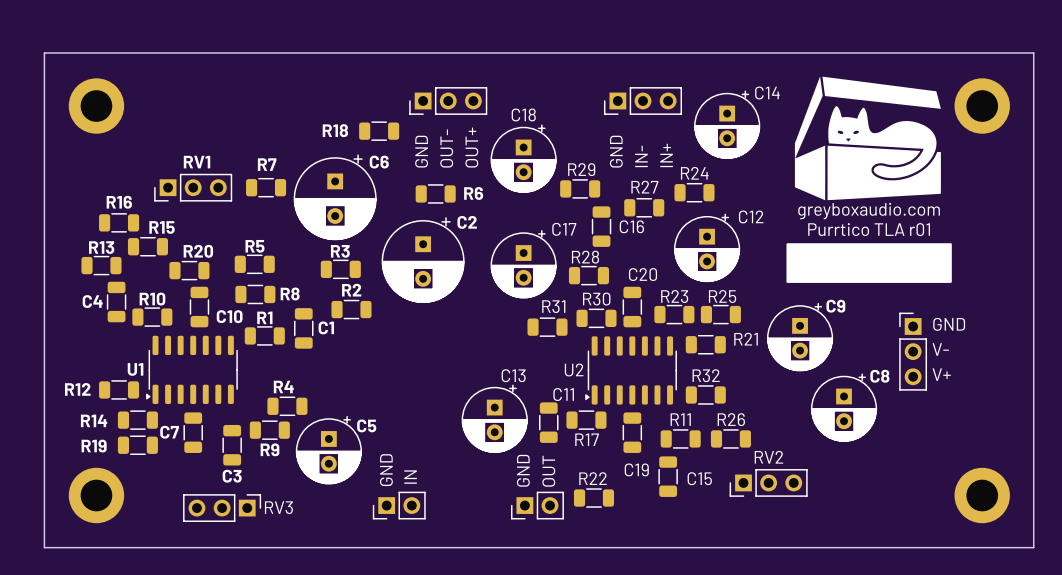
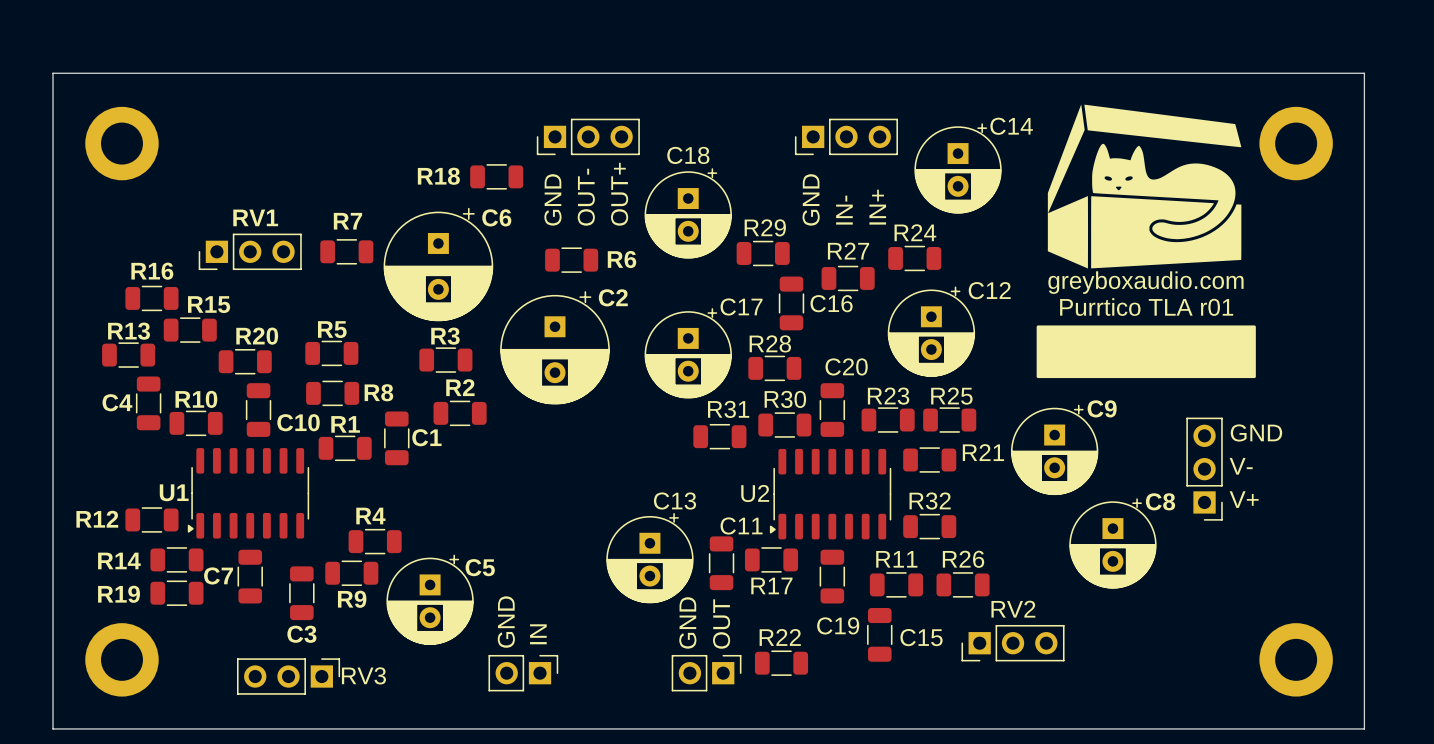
part rotation: 0° (913, 351) -> 180° (1204, 469)
part rotation: 0° (399, 505) -> 180° (523, 673)
part rotation: 0° (537, 505) -> 180° (706, 673)

